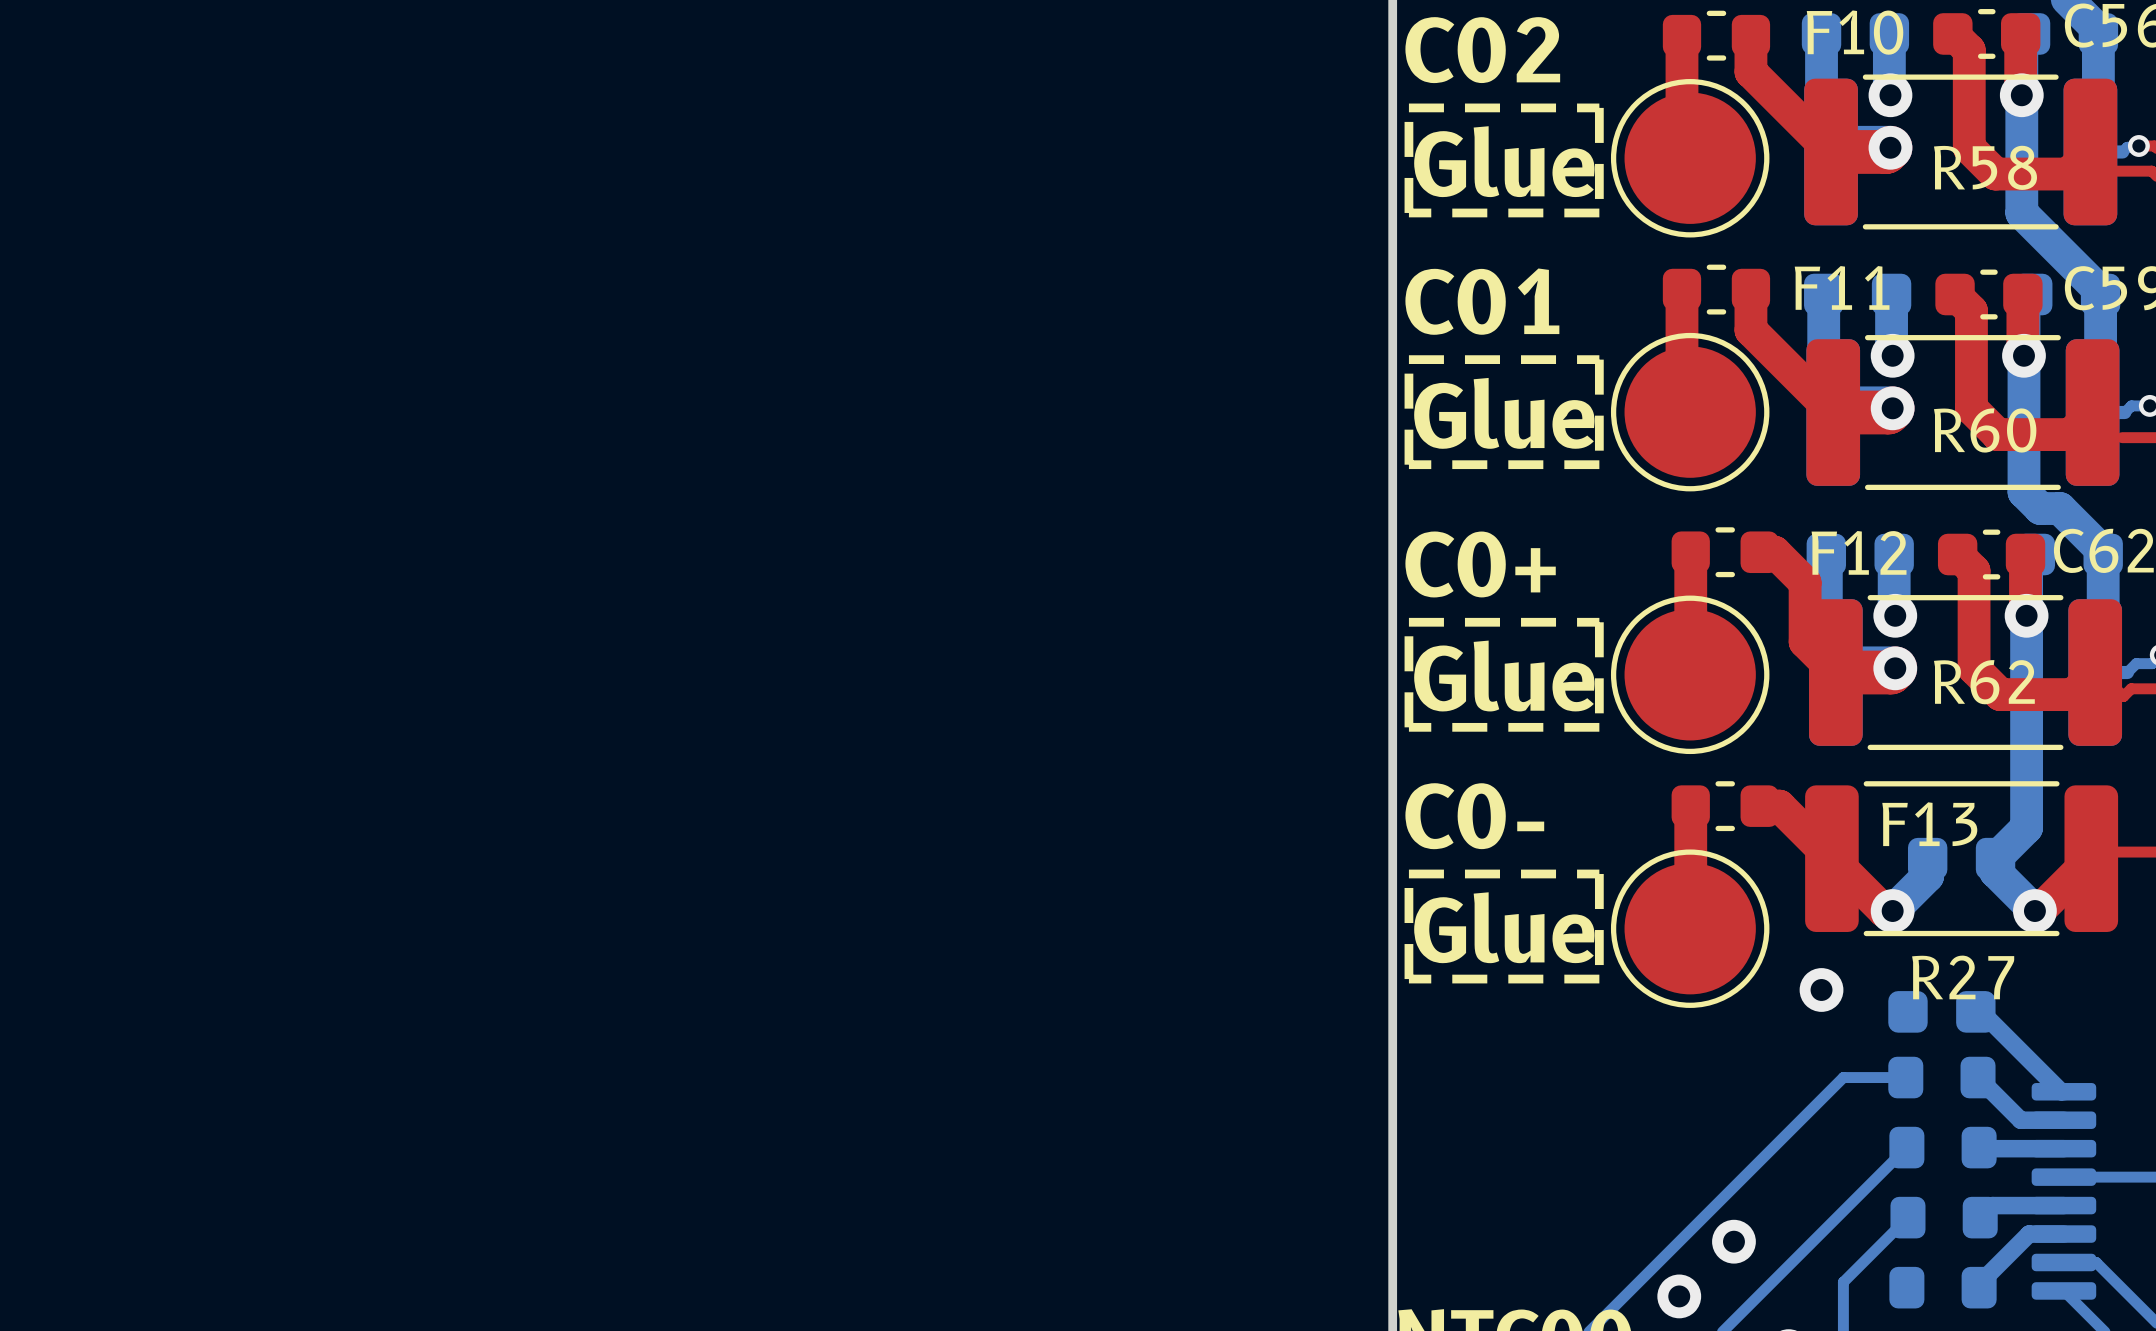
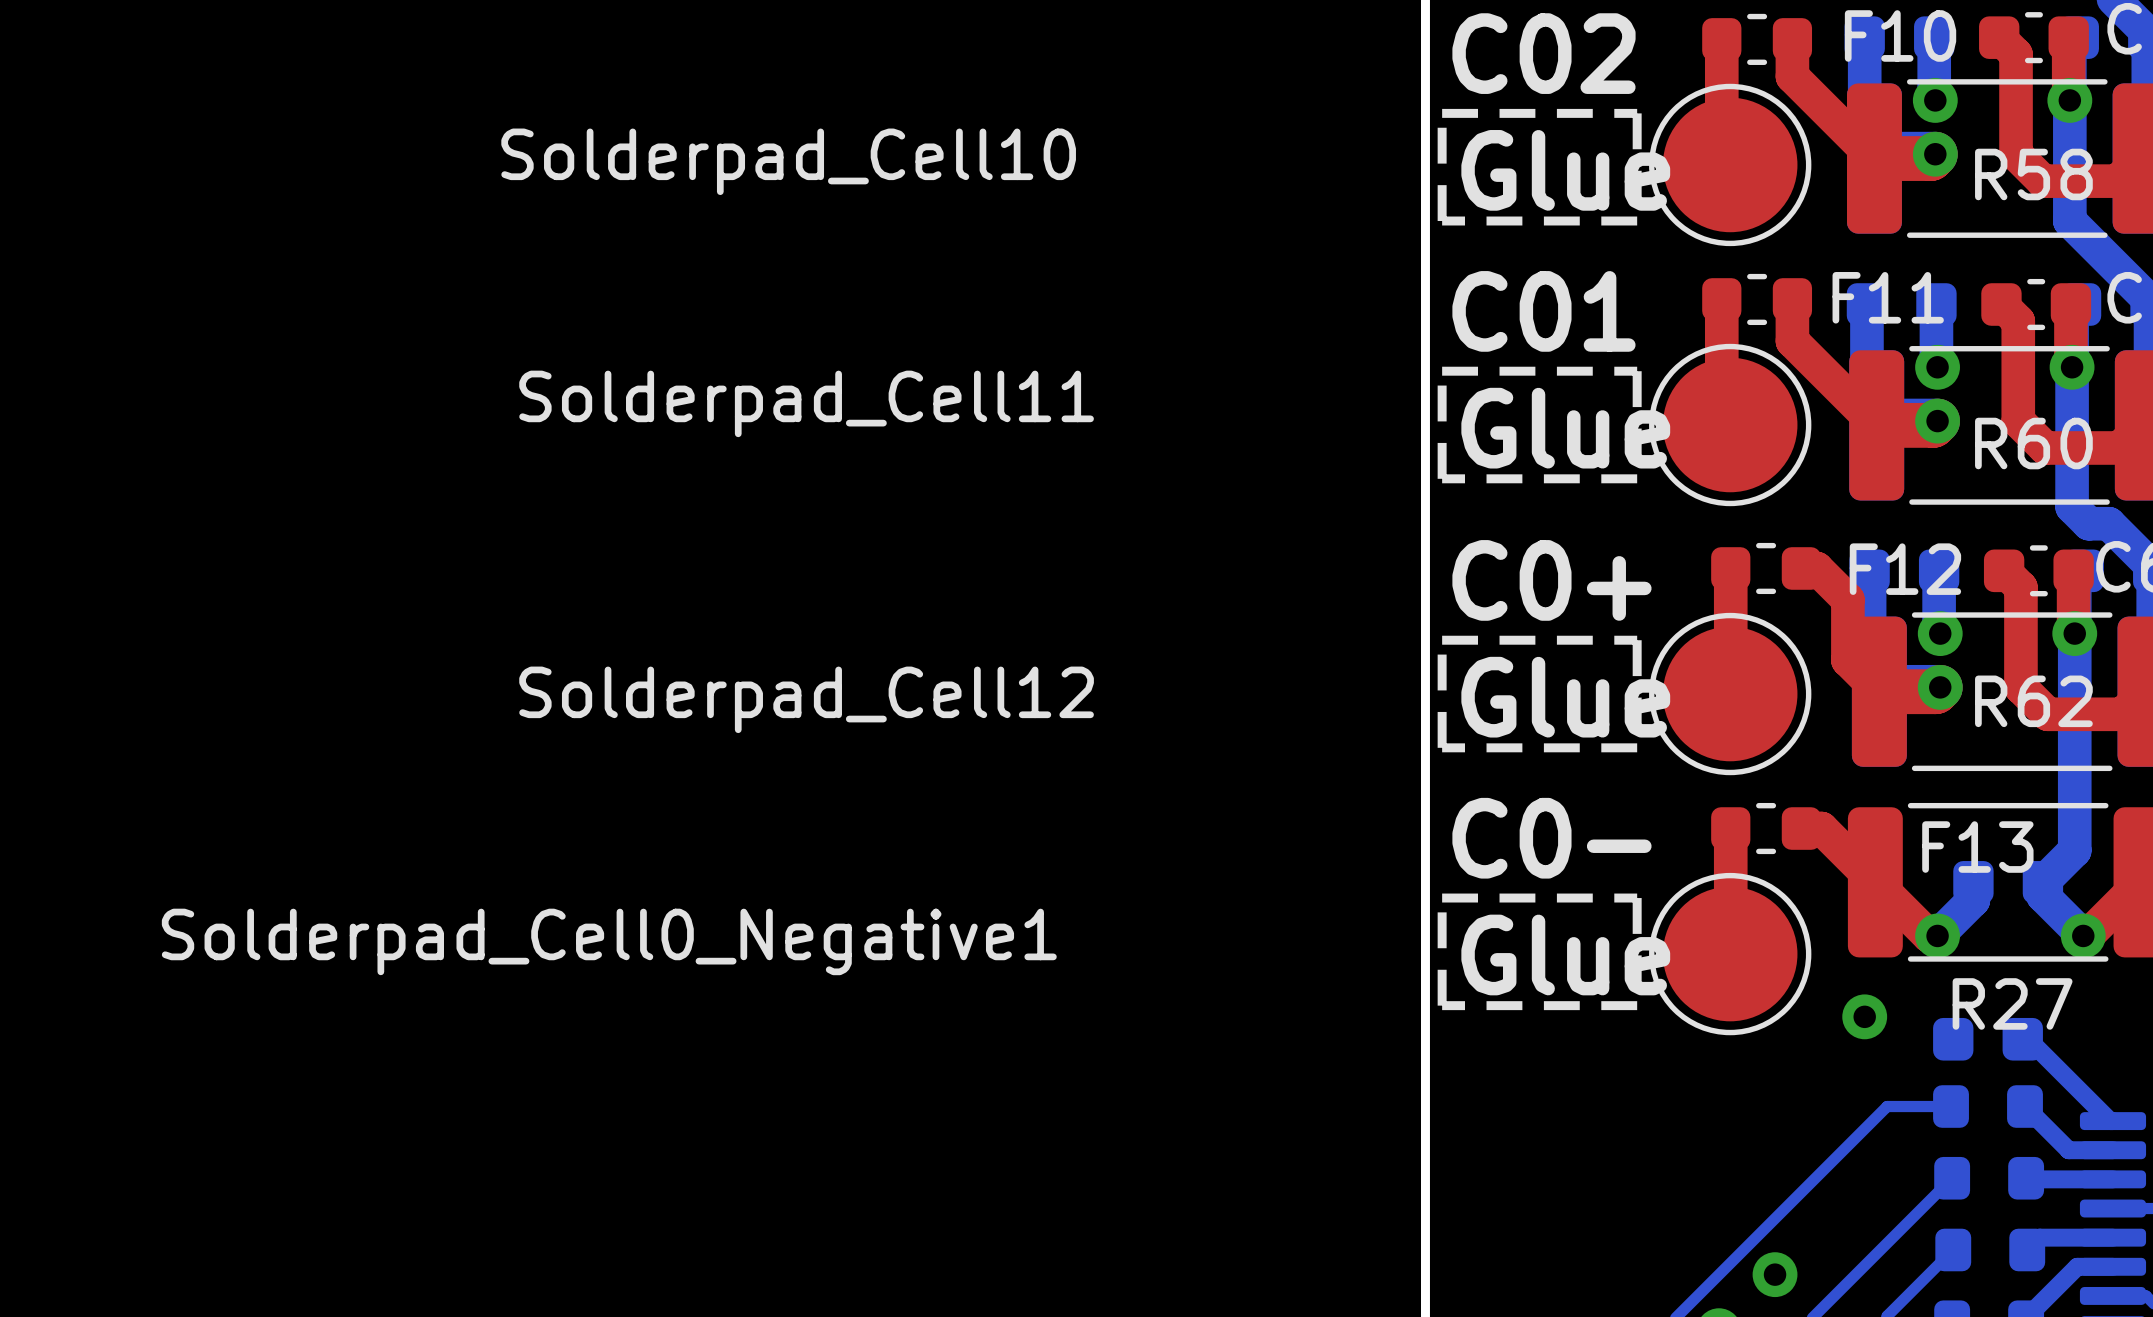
Solderpad_Cell10 name: none -> Solderpad_Cell10 (788, 161)
Solderpad_Cell11 name: none -> Solderpad_Cell11 (806, 403)
Solderpad_Cell12 name: none -> Solderpad_Cell12 (806, 699)
Solderpad_Cell0_Negative1 name: none -> Solderpad_Cell0_Negative1 (609, 941)

